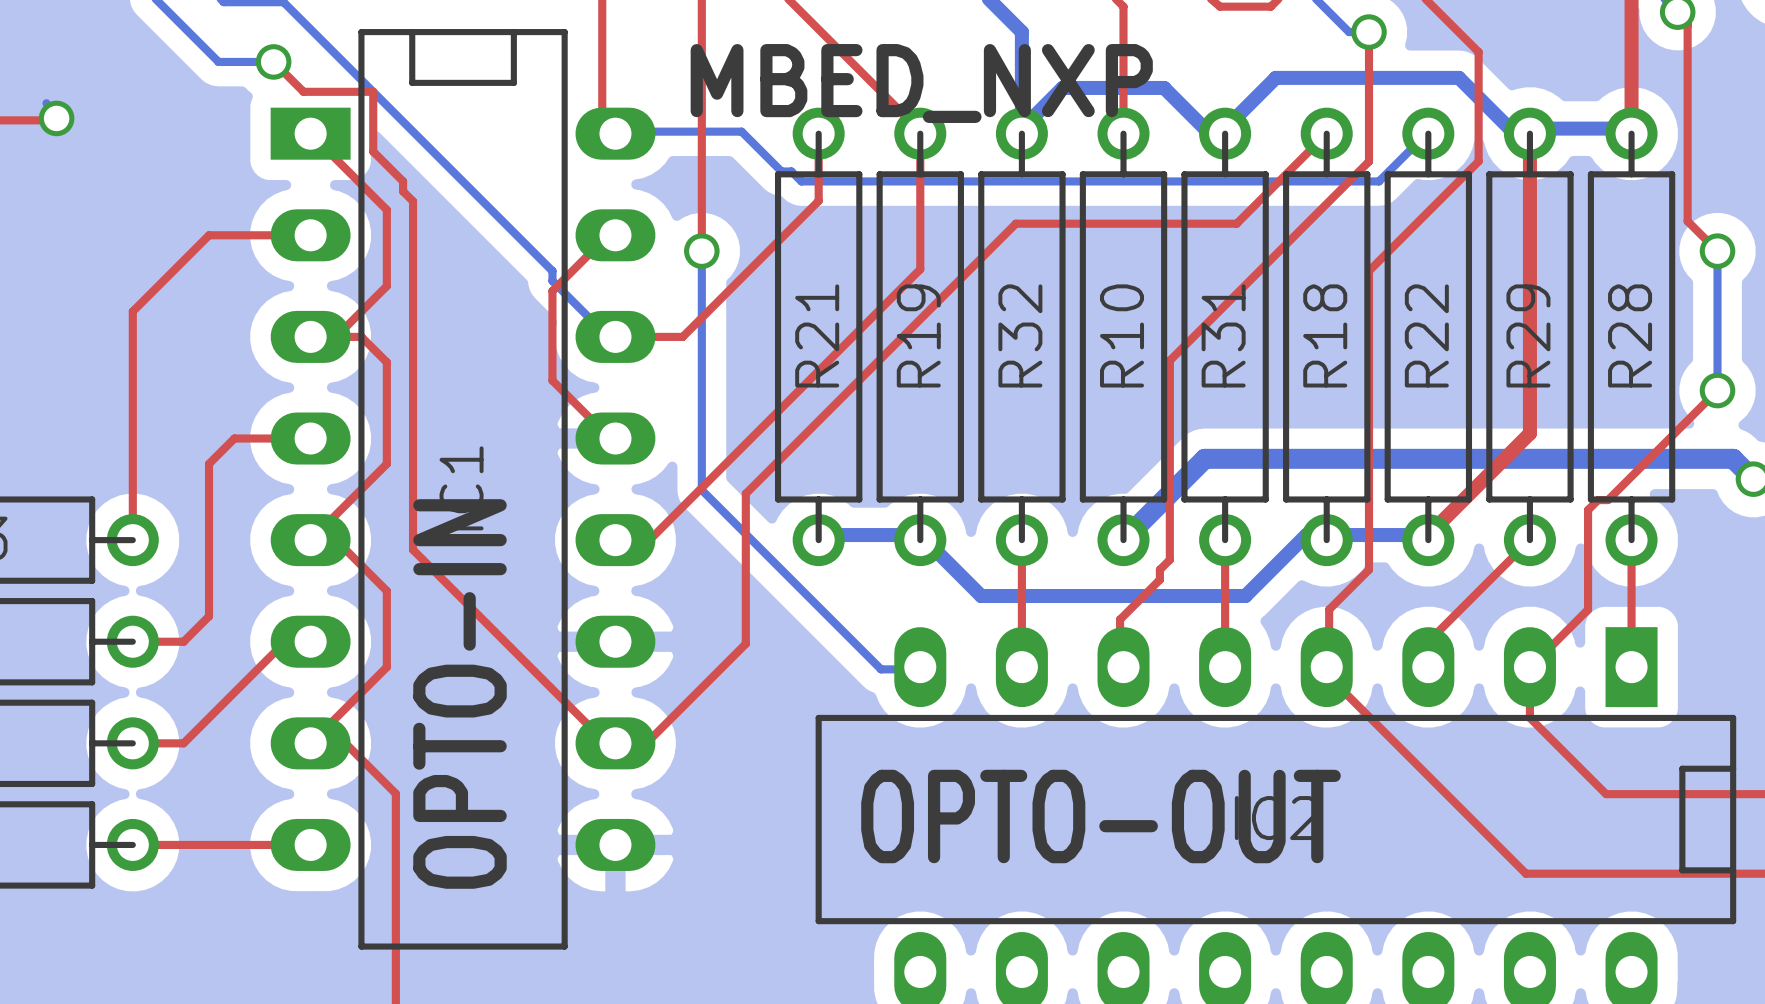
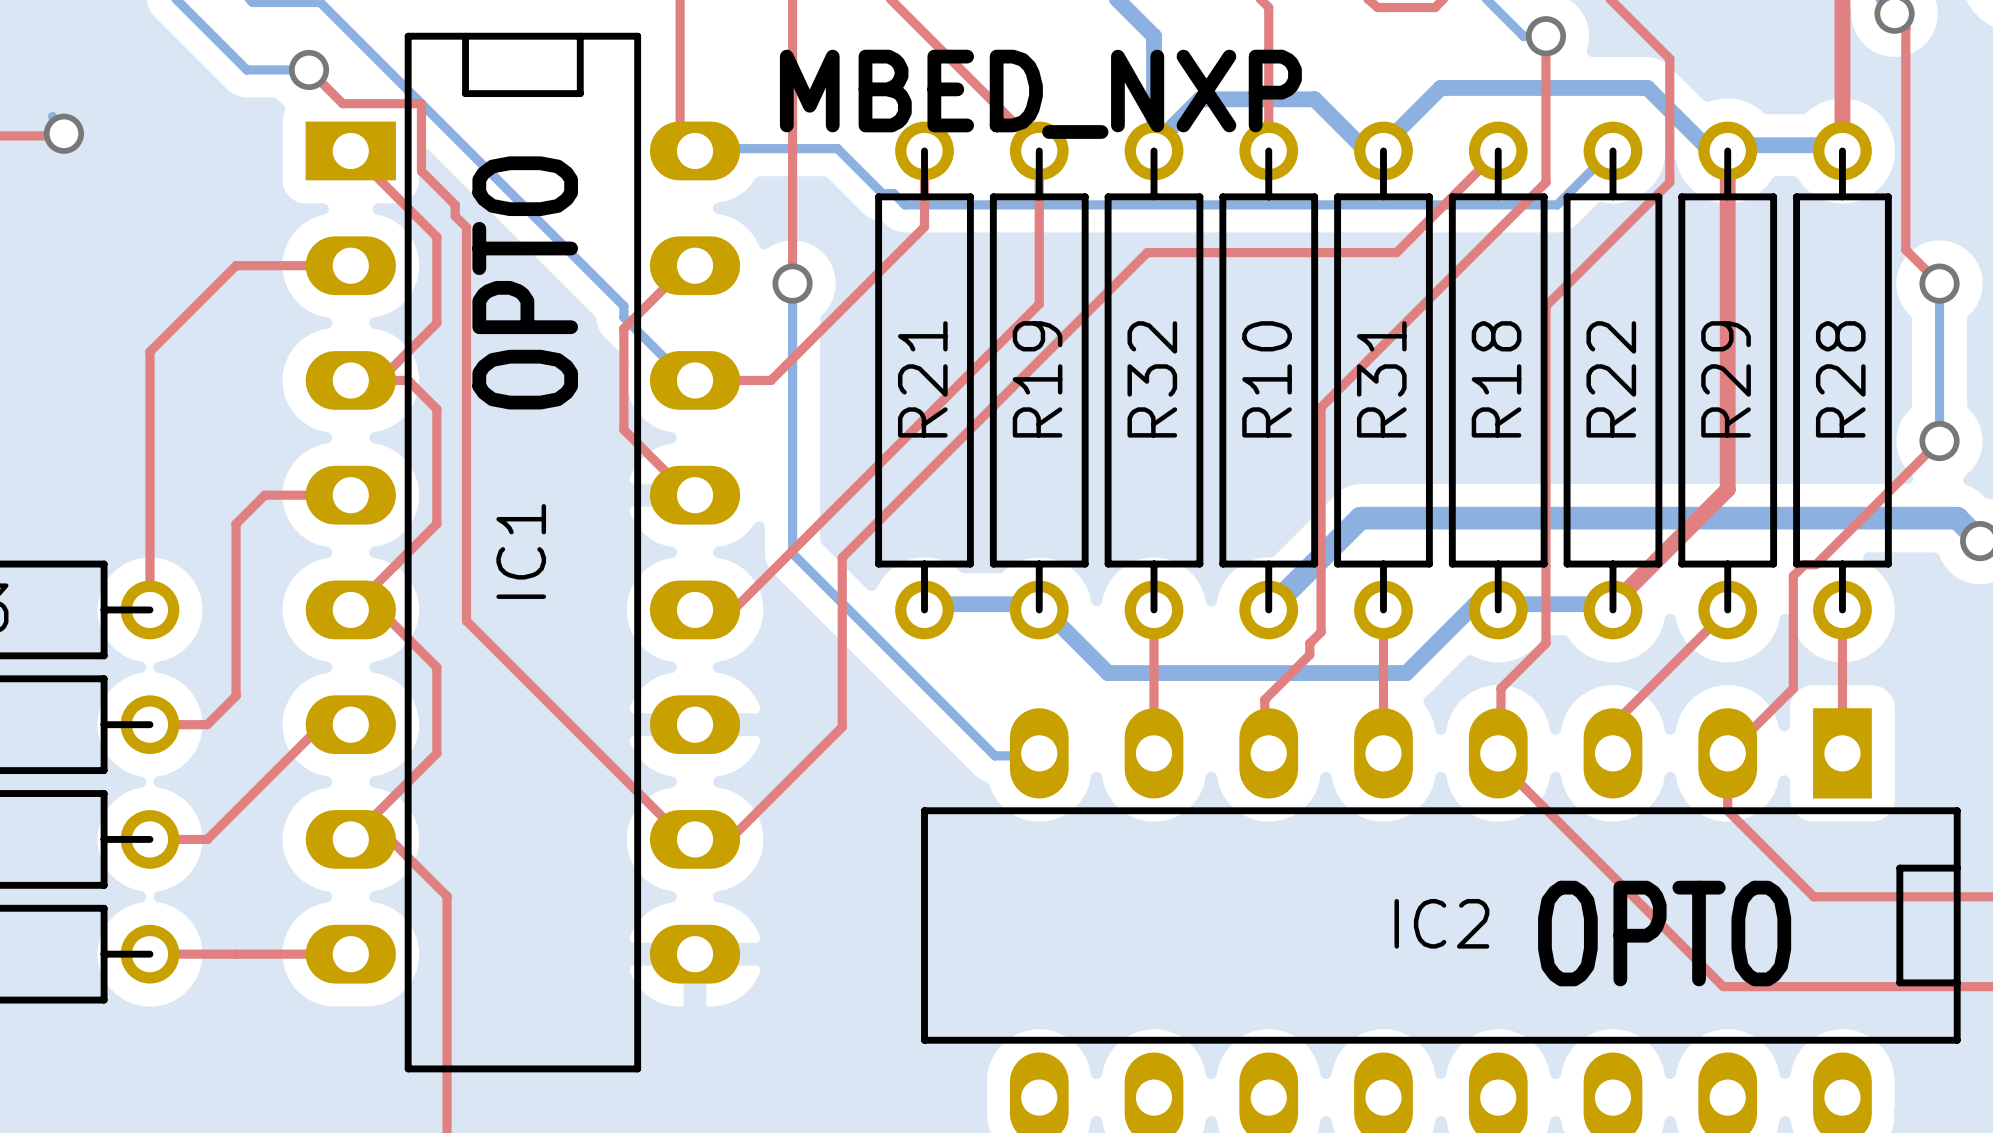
text: none -> OPTO (525, 282)
text: OPTO-IN (460, 693) -> none
text: OPTO-OUT (1101, 816) -> OPTO (1664, 933)

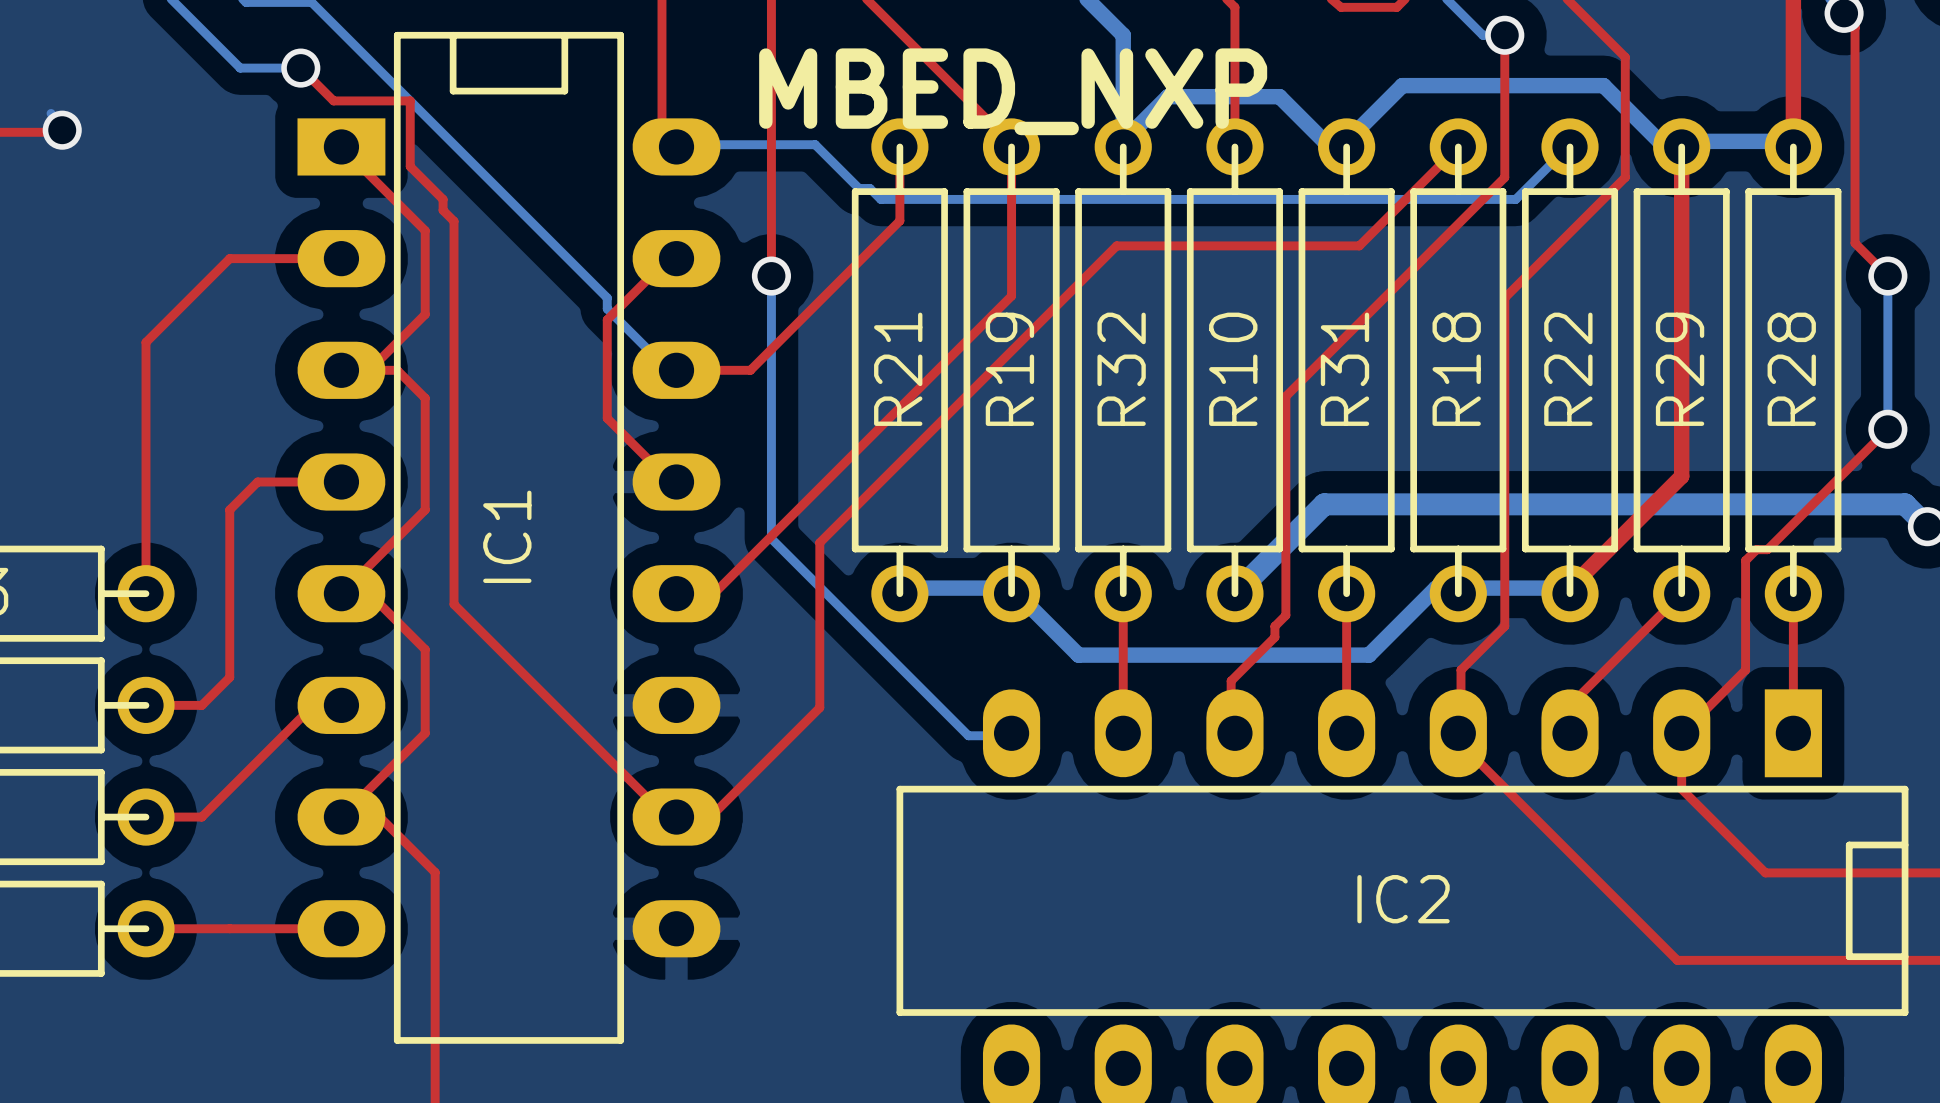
text: OPTO (525, 282) -> none
text: OPTO (1664, 933) -> none

